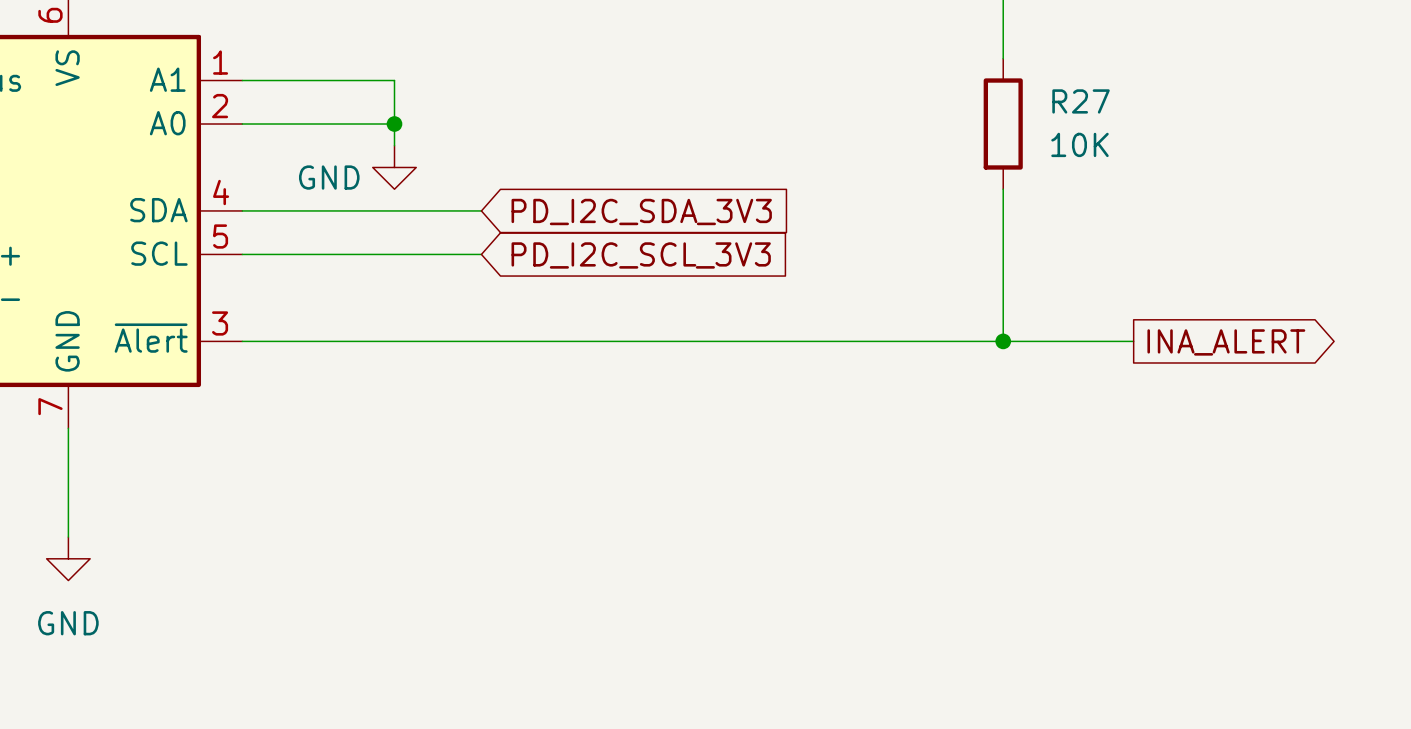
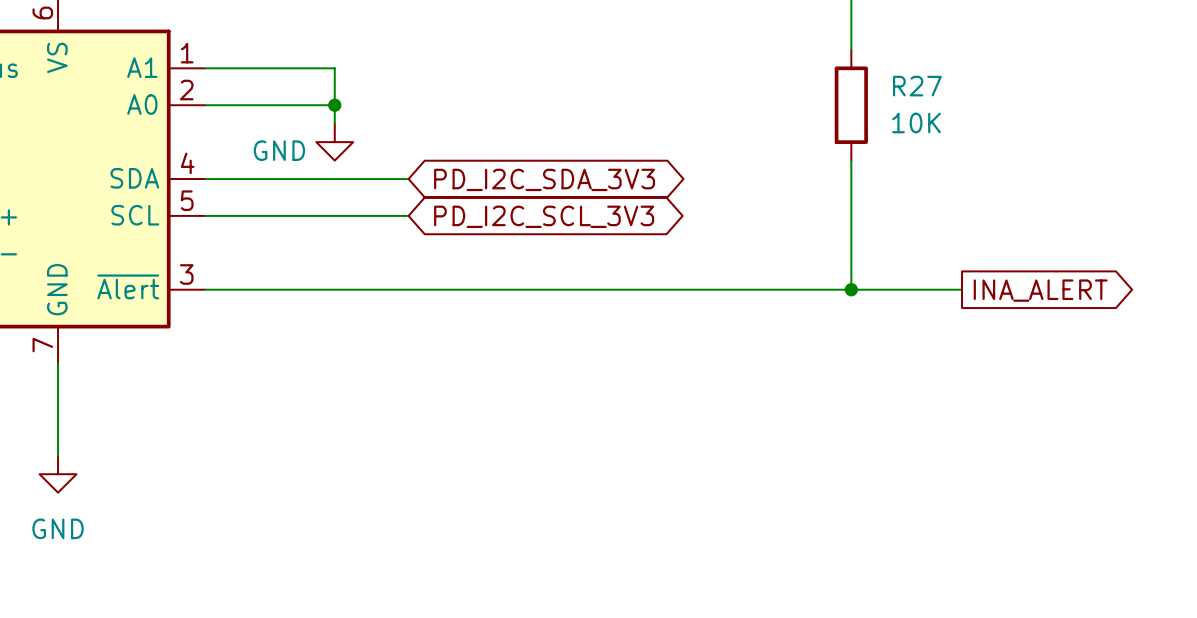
global label shape: input (641, 212) -> bidirectional (544, 179)
global label shape: input (641, 255) -> bidirectional (544, 216)

